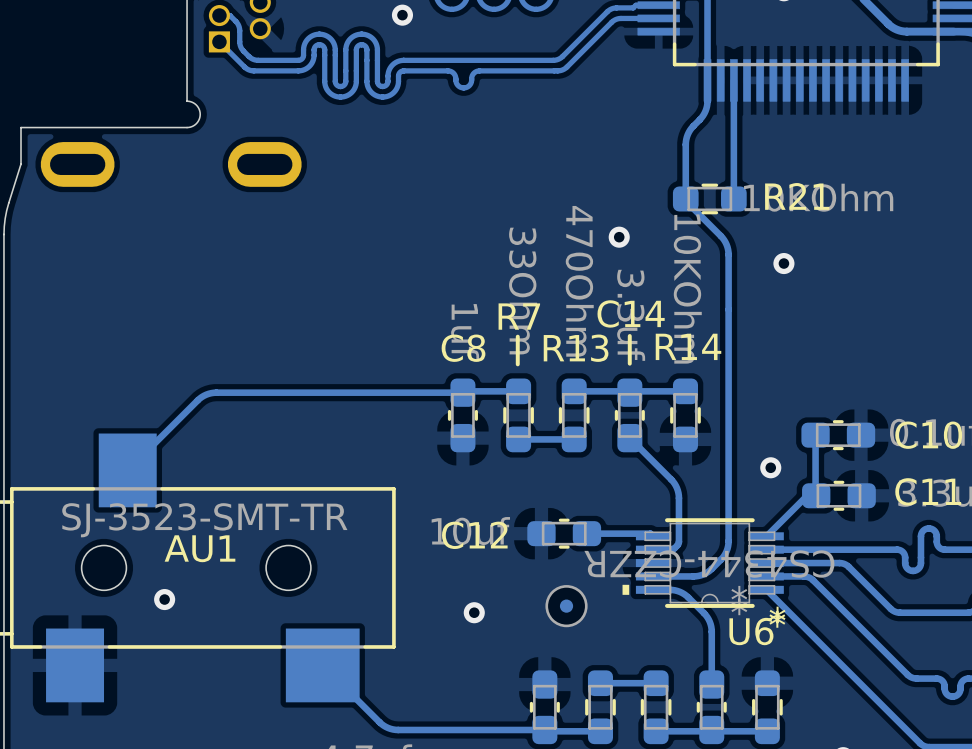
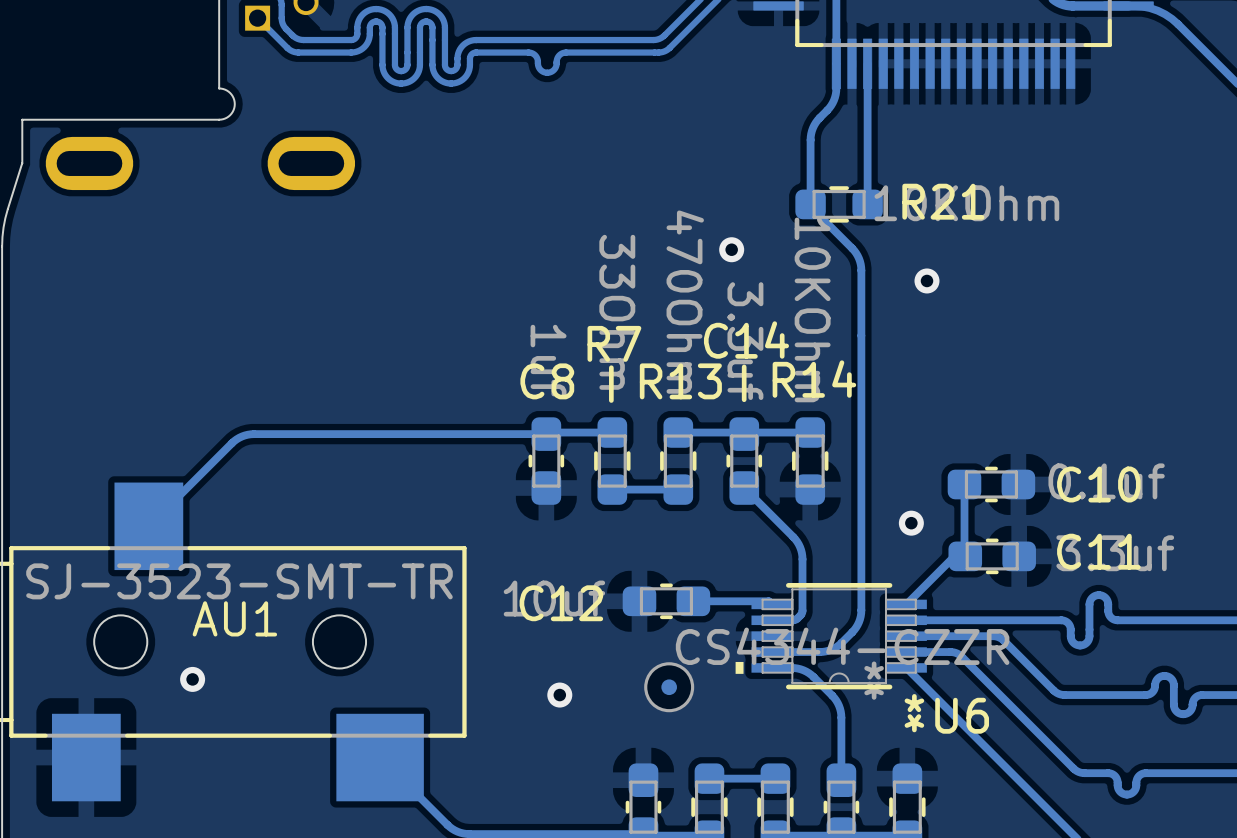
U6 footprint: [622, 518, 784, 608] -> [735, 582, 927, 690]
U6 name position: U6 (751, 631) -> U6 (962, 715)

